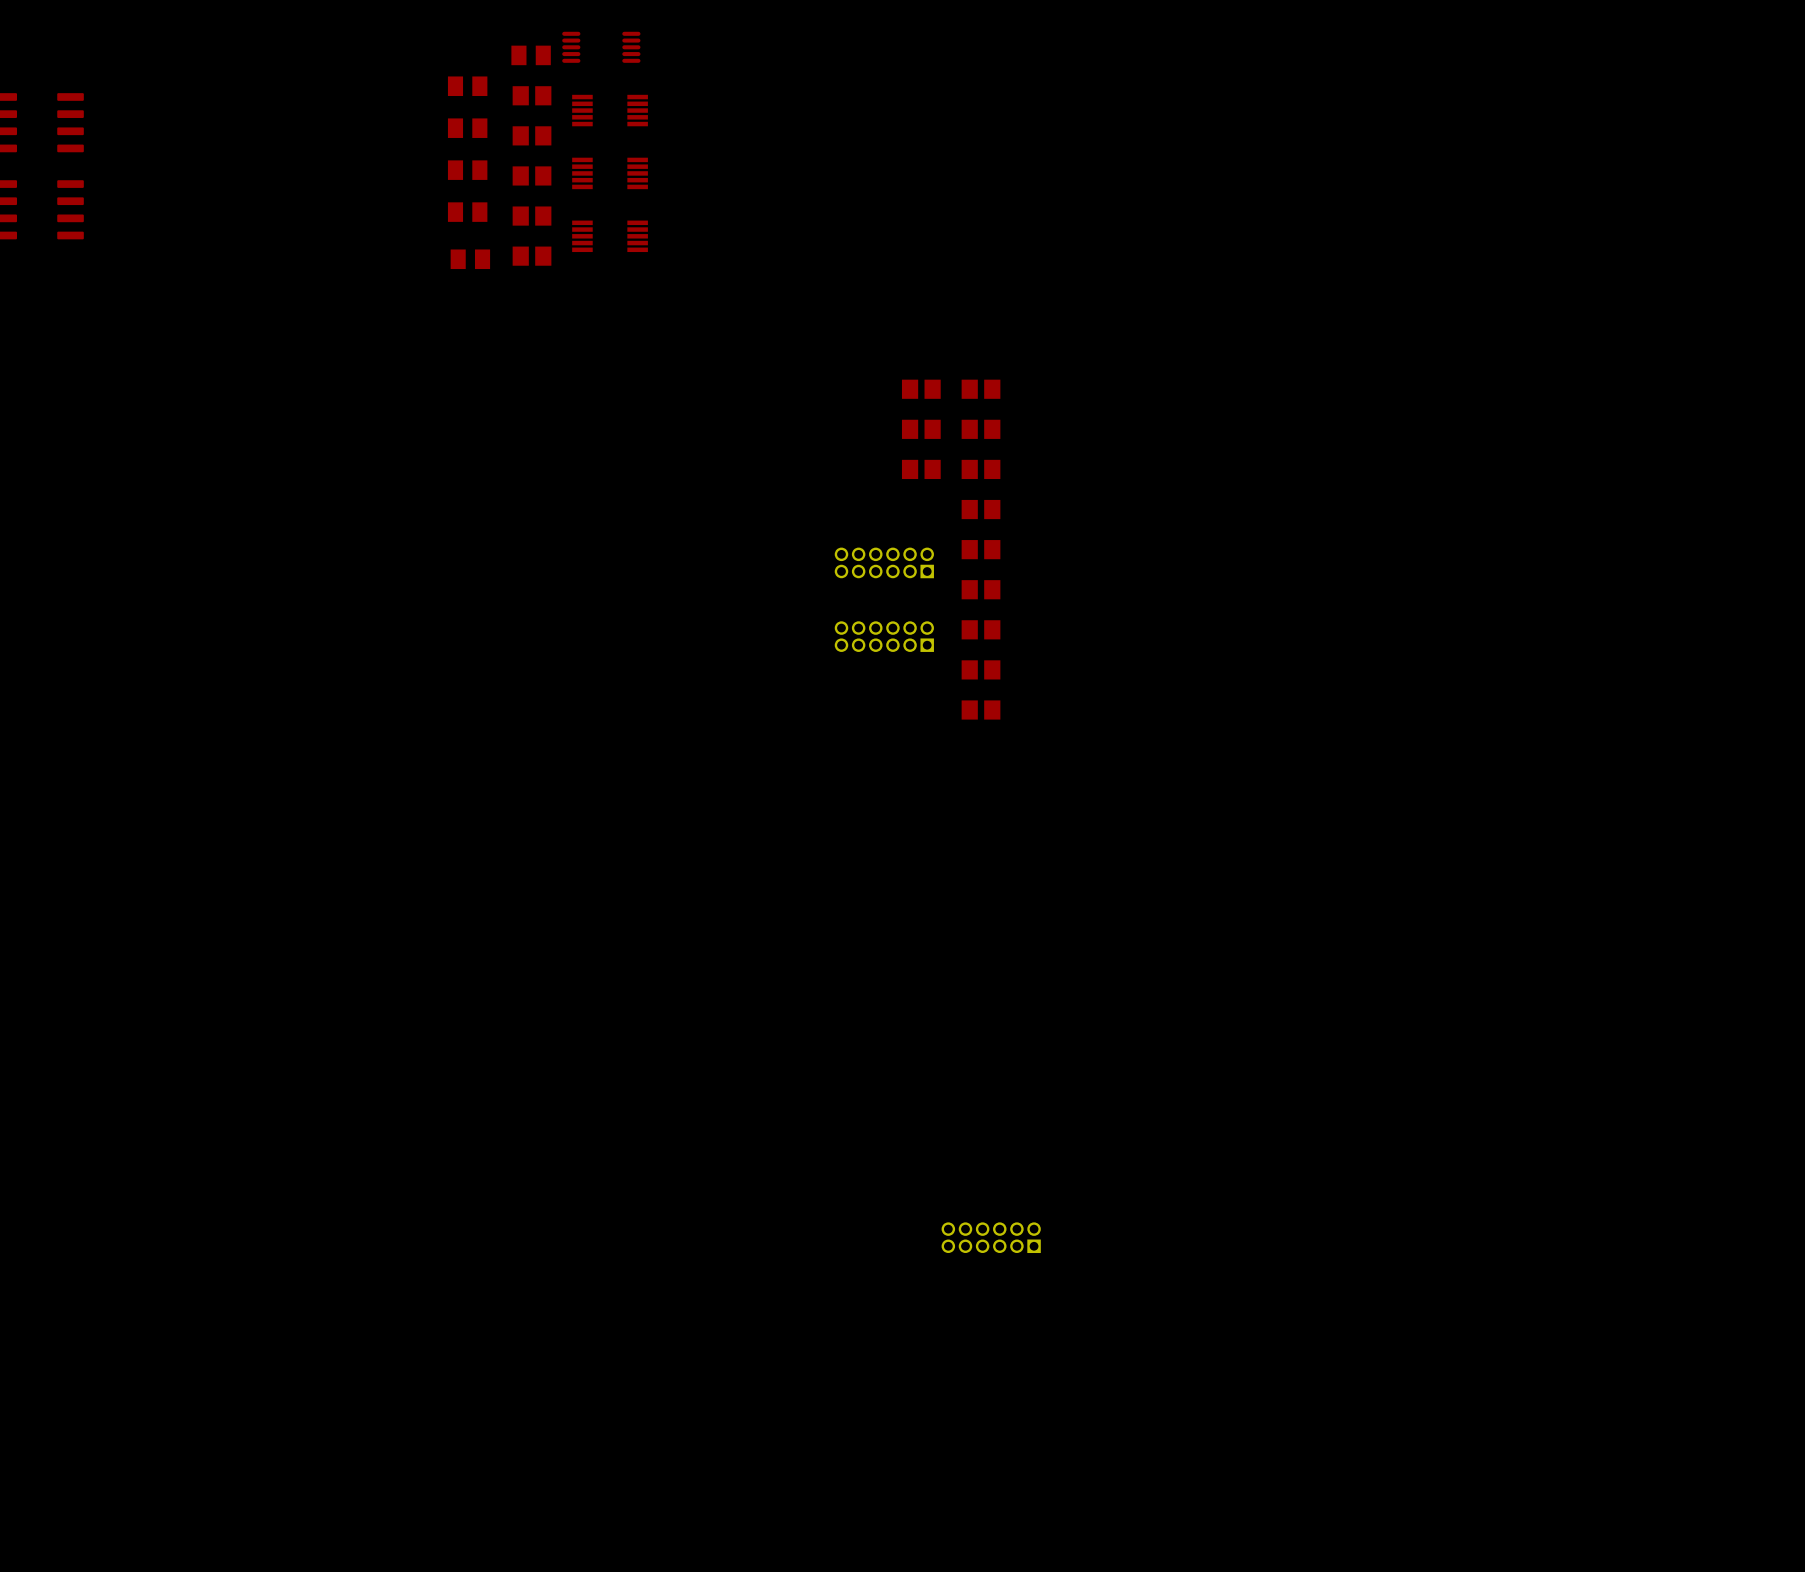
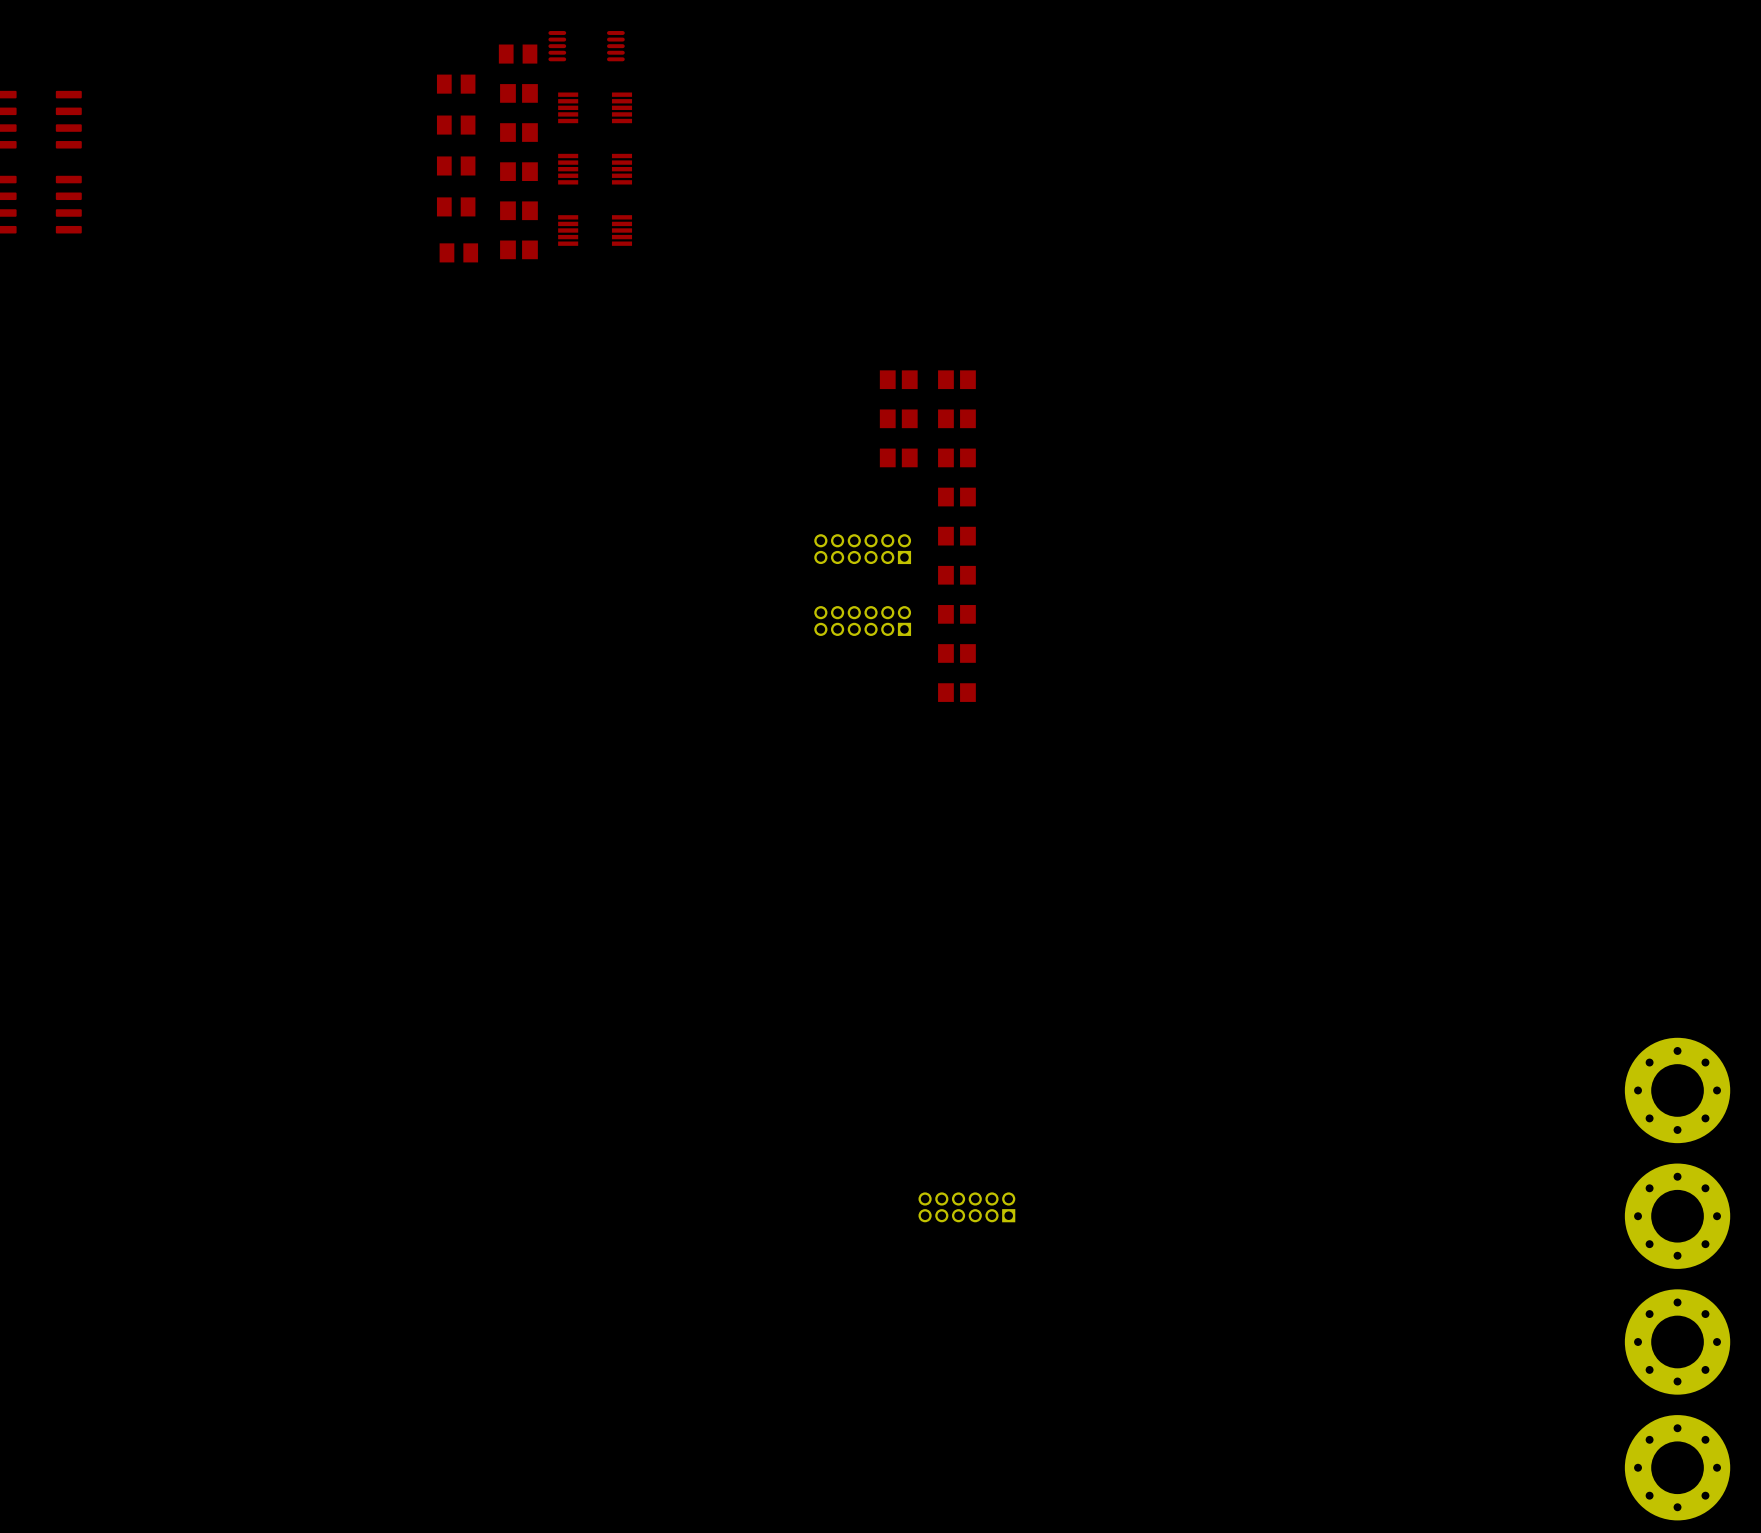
part: none -> (1677, 1090)
part: none -> (1677, 1216)
part: none -> (1677, 1341)
part: none -> (1677, 1467)

